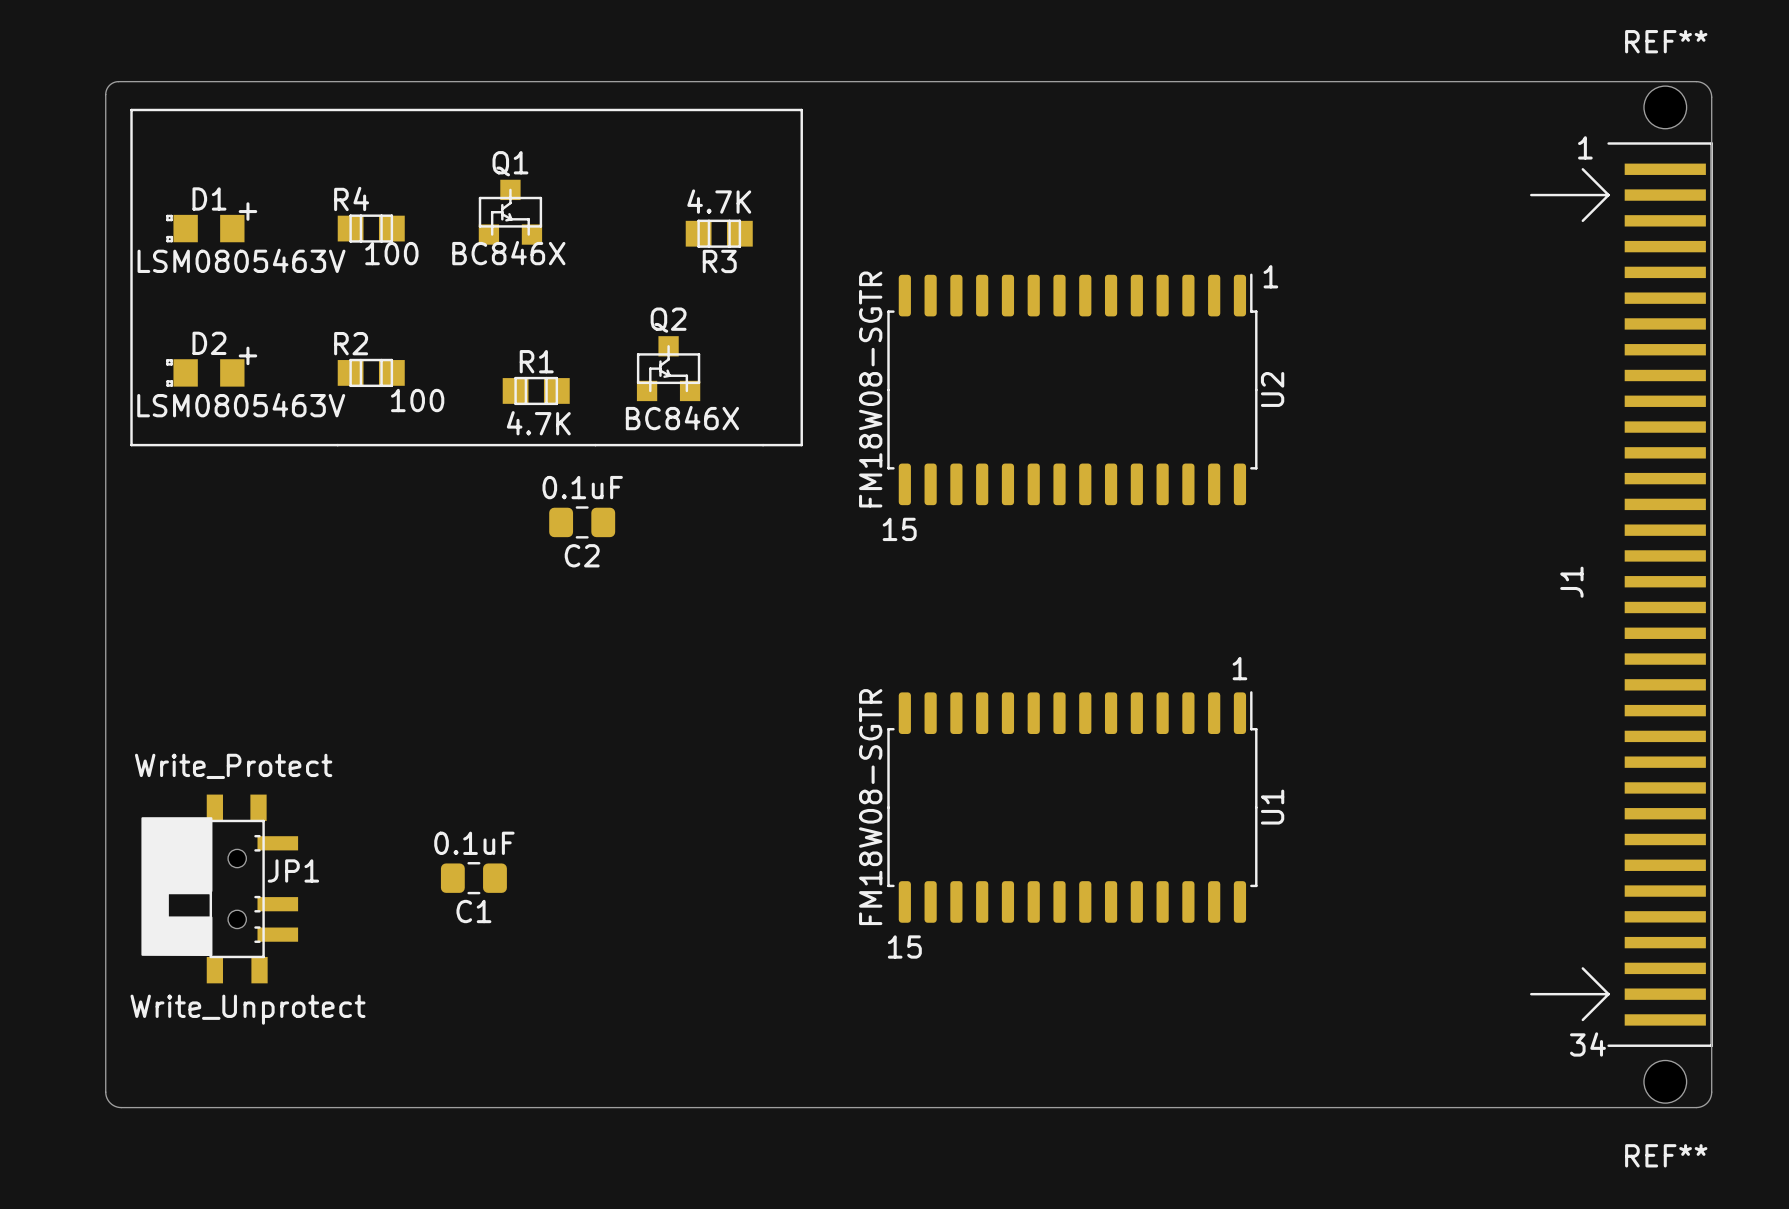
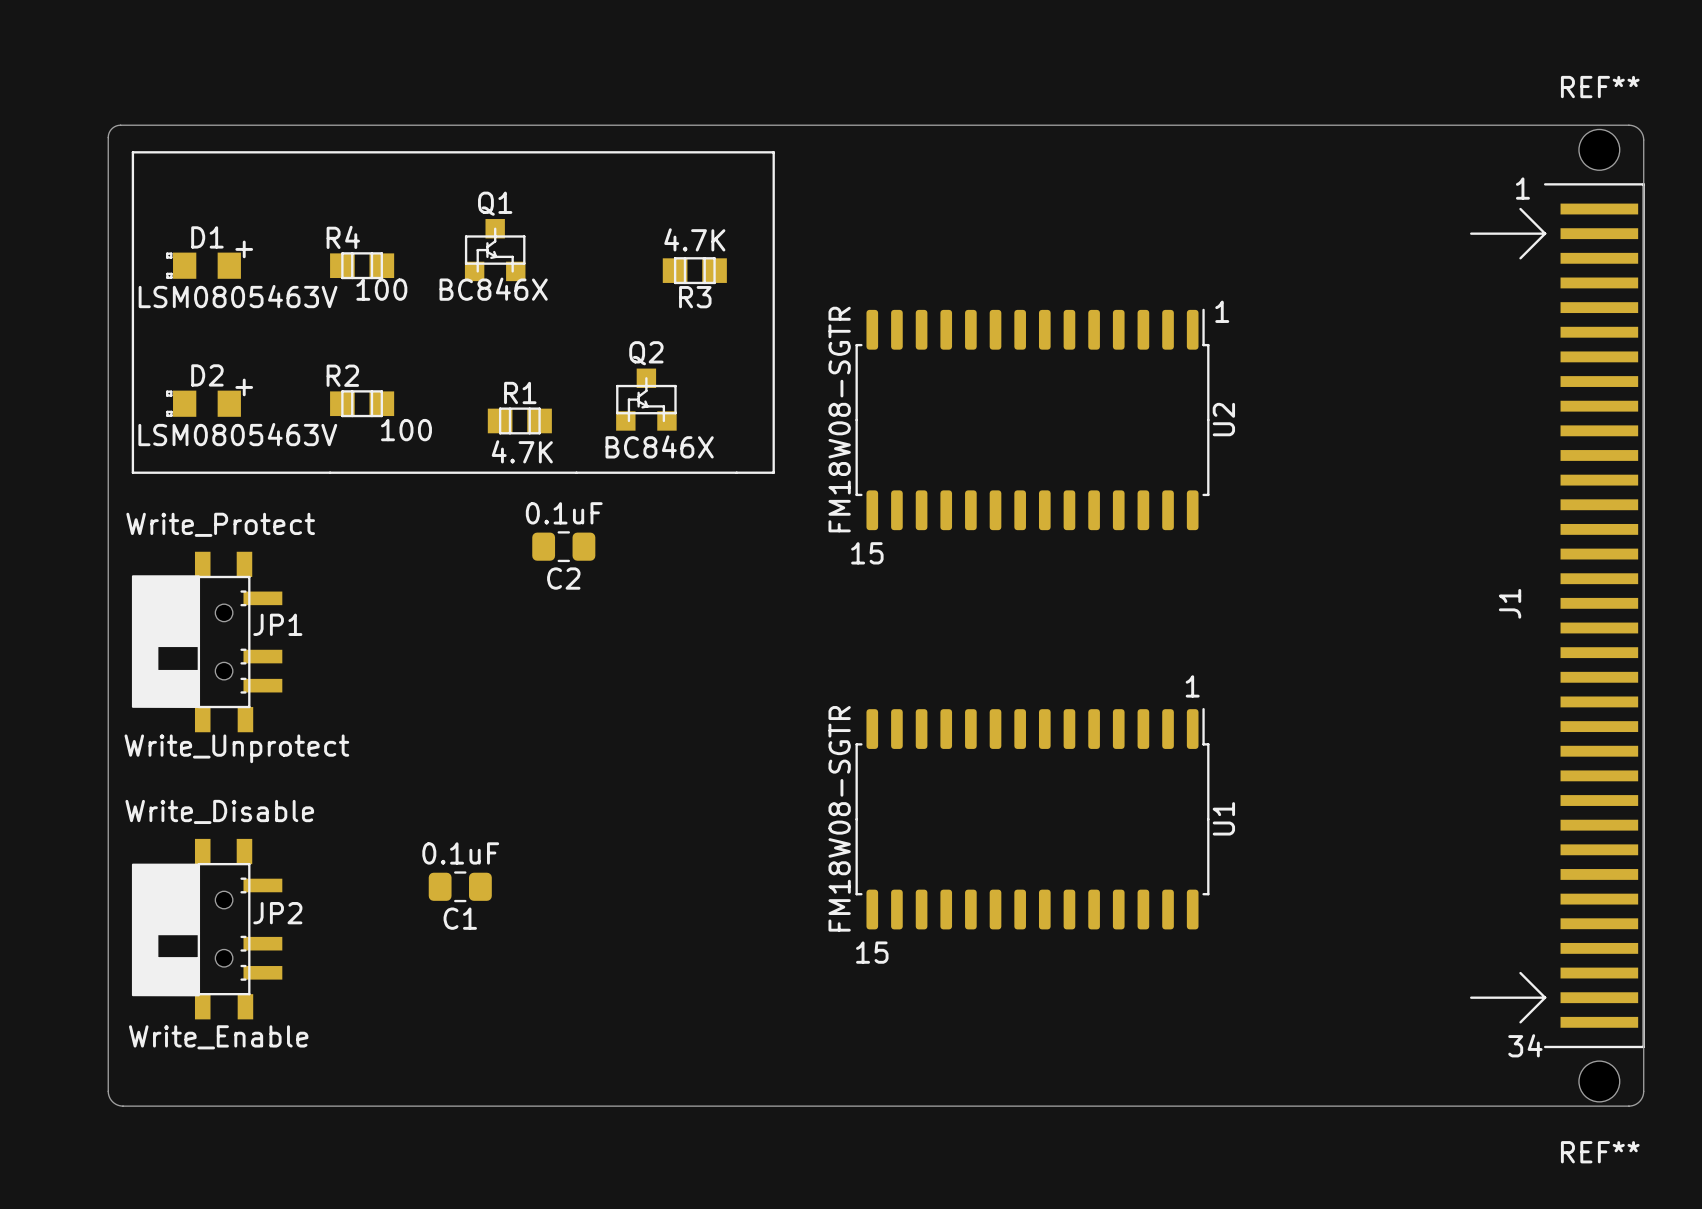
drawing: none -> [131, 575, 200, 708]
drawing position: (176, 886) -> (165, 929)
JP1 position: (232, 888) -> (219, 642)
JP2: none -> Write_Disable (219, 929)
text position: Write_Unprotect (247, 1009) -> Write_Unprotect (236, 748)
text: none -> Write_Enable (218, 1037)

